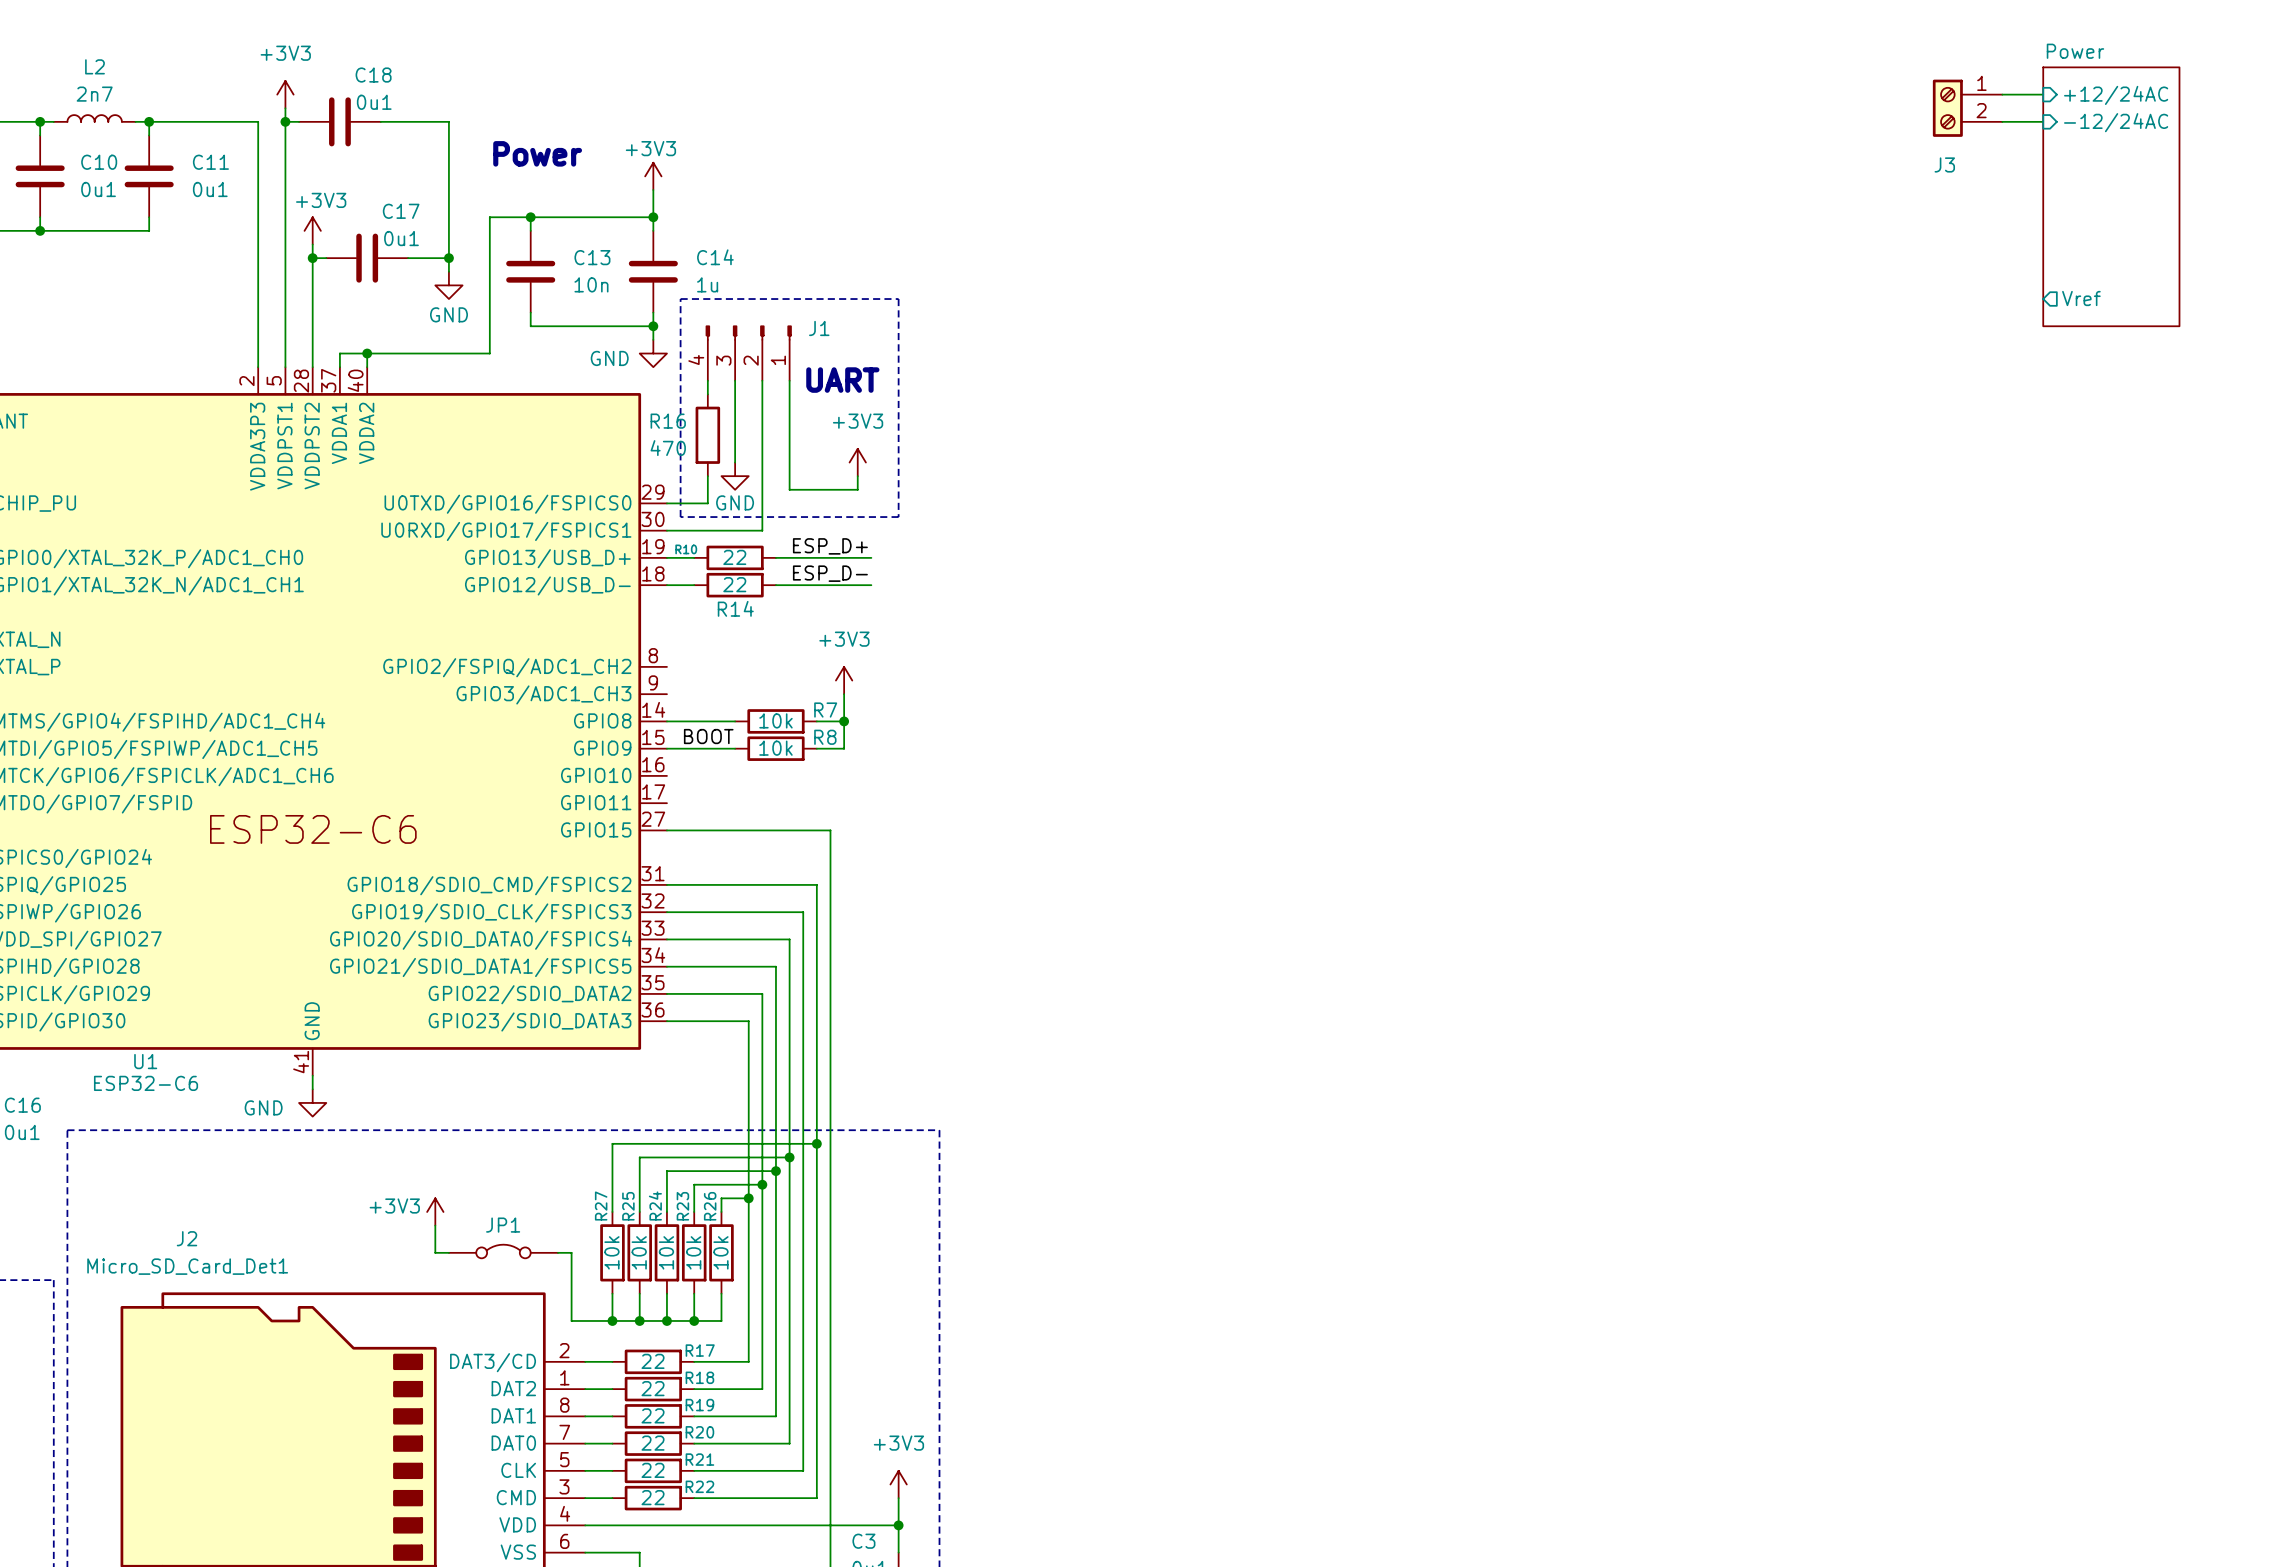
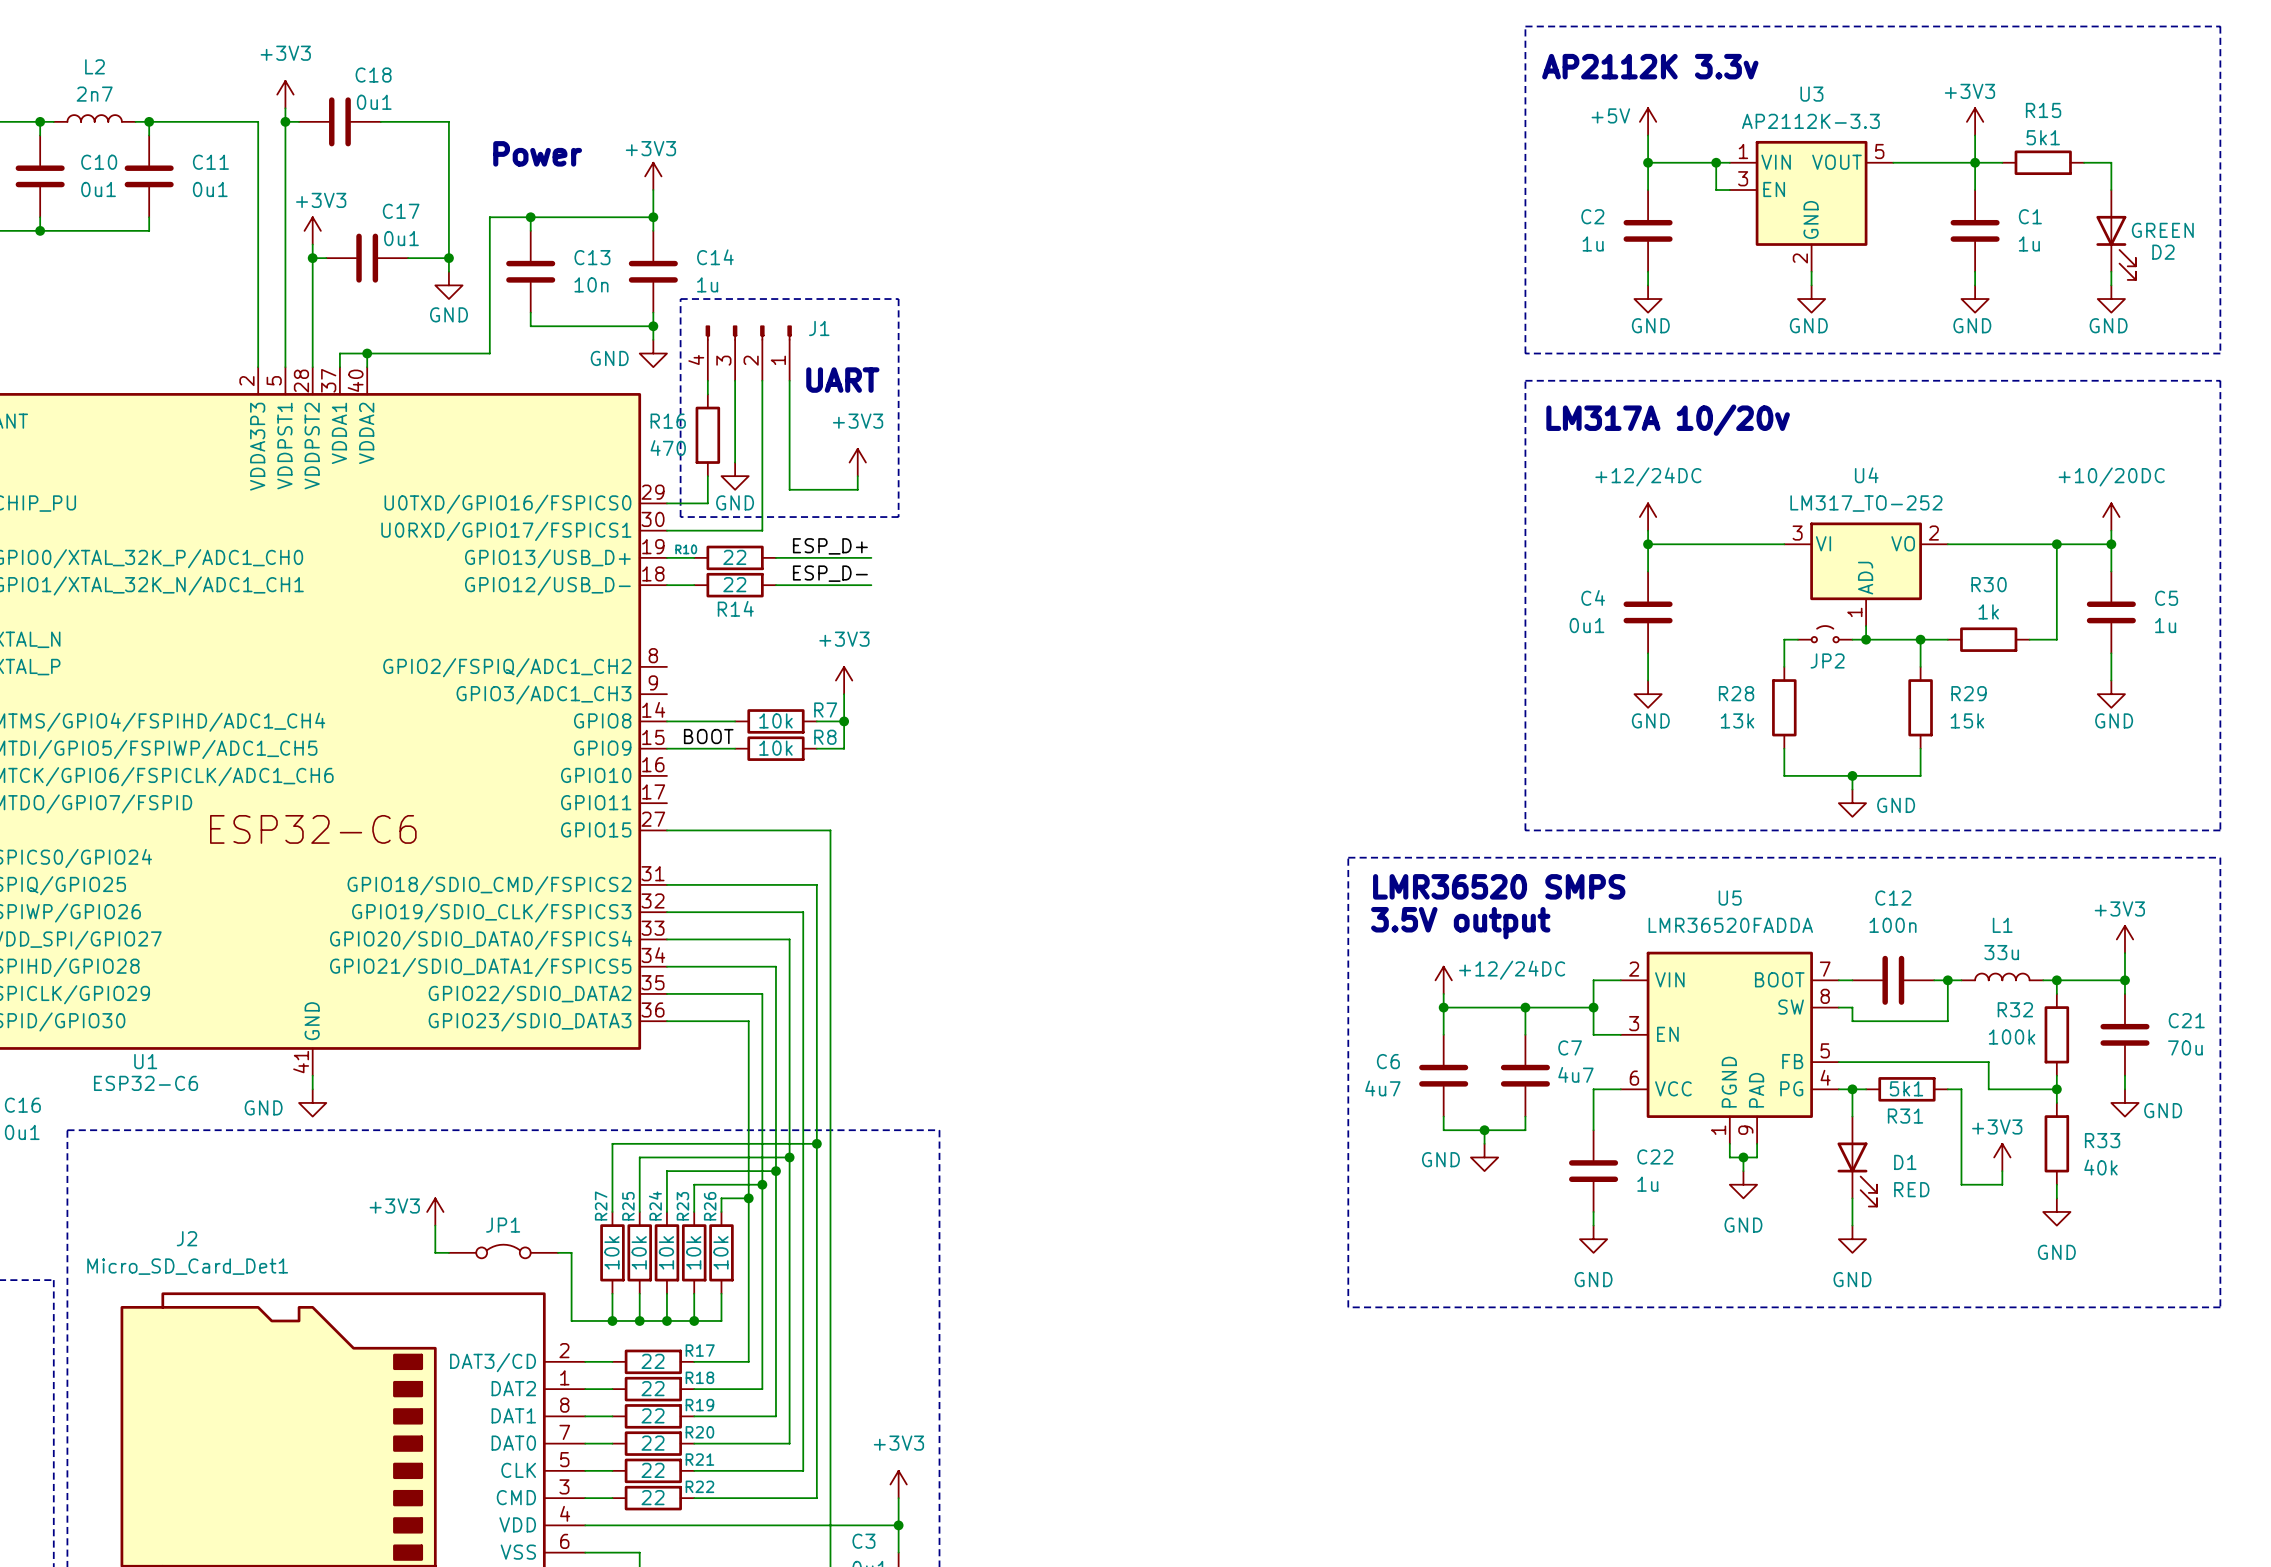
line: none -> (1525, 26) (2220, 26) (2220, 353) (1525, 353) (1525, 26)
text: none -> AP2112K 3.3v (1650, 66)
wire: (2002, 94) (2043, 94) -> none
sheet pin: +12/24AC (2116, 95) -> none
J3: (1967, 108) -> none
power symbol: none -> +5V (1648, 121)
power symbol: none -> +3V3 (1975, 121)
wire: (2002, 121) (2043, 121) -> none
sheet pin: -12/24AC (2116, 122) -> none
wire: none -> (1648, 135) (1648, 190)
wire: none -> (1975, 135) (1975, 190)
wire: none -> (1648, 162) (1729, 162)
junction: none -> (1648, 162)
wire: none -> (1716, 162) (1716, 190) (1729, 190)
junction: none -> (1716, 162)
wire: none -> (1893, 162) (2002, 162)
junction: none -> (1975, 162)
R15: none -> 5k1 (2043, 162)
wire: none -> (2084, 162) (2111, 162) (2111, 190)
sheet Power: (2111, 196) -> none
U3: none -> AP2112K-3.3 (1811, 206)
C2: none -> 1u (1648, 230)
C1: none -> 1u (1975, 230)
D2: none -> GREEN (2116, 234)
wire: none -> (1648, 271) (1648, 285)
wire: none -> (1811, 271) (1811, 285)
wire: none -> (1975, 271) (1975, 285)
wire: none -> (2111, 271) (2111, 285)
sheet pin: Vref (2081, 298) -> none
power symbol: none -> GND (1648, 299)
power symbol: none -> GND (1811, 299)
power symbol: none -> GND (1975, 299)
power symbol: none -> GND (2111, 299)
line: none -> (1525, 380) (1525, 830) (2220, 830) (2220, 380) (1525, 380)
text: none -> LM317A 10/20v (1668, 420)
power symbol: none -> +12/24DC (1648, 517)
power symbol: none -> +10/20DC (2111, 517)
wire: none -> (1648, 530) (1648, 571)
wire: none -> (2111, 530) (2111, 571)
wire: none -> (1648, 544) (1784, 544)
junction: none -> (1648, 544)
wire: none -> (1947, 544) (2111, 544)
wire: none -> (2056, 544) (2056, 639) (2029, 639)
junction: none -> (2056, 544)
junction: none -> (2111, 544)
U4: none -> LM317_TO-252 (1866, 574)
C4: none -> 0u1 (1648, 612)
C5: none -> 1u (2111, 612)
wire: none -> (1866, 626) (1866, 639)
JP2: none -> (1825, 634)
wire: none -> (1797, 639) (1784, 639) (1784, 666)
wire: none -> (1852, 639) (1947, 639)
junction: none -> (1866, 639)
wire: none -> (1920, 639) (1920, 666)
junction: none -> (1920, 639)
R30: none -> 1k (1988, 639)
wire: none -> (1648, 653) (1648, 680)
wire: none -> (2111, 653) (2111, 680)
power symbol: none -> GND (1648, 694)
power symbol: none -> GND (2111, 694)
R28: none -> 13k (1784, 707)
R29: none -> 15k (1920, 707)
wire: none -> (1784, 748) (1784, 775) (1920, 775) (1920, 748)
wire: none -> (1852, 775) (1852, 789)
junction: none -> (1852, 775)
power symbol: none -> GND (1852, 803)
line: none -> (1348, 857) (2220, 857) (2220, 1307) (1348, 1307) (1348, 857)
text: none -> LMR36520 SMPS (1499, 886)
text: none -> 3.5V output (1460, 923)
power symbol: none -> +3V3 (2124, 939)
wire: none -> (2124, 953) (2124, 993)
L1: none -> 33u (2002, 976)
power symbol: none -> +12/24DC (1443, 980)
wire: none -> (1620, 980) (1593, 980) (1593, 1034) (1620, 1034)
wire: none -> (1838, 980) (1852, 980)
C12: none -> 100n (1893, 980)
wire: none -> (1934, 980) (1961, 980)
wire: none -> (1947, 980) (1947, 1021) (1852, 1021) (1852, 1007) (1838, 1007)
junction: none -> (1947, 980)
wire: none -> (2043, 980) (2124, 980)
wire: none -> (2056, 980) (2056, 993)
junction: none -> (2056, 980)
junction: none -> (2124, 980)
wire: none -> (1443, 993) (1443, 1034)
wire: none -> (1443, 1007) (1593, 1007)
junction: none -> (1443, 1007)
wire: none -> (1525, 1007) (1525, 1034)
junction: none -> (1525, 1007)
junction: none -> (1593, 1007)
R32: none -> 100k (2056, 1034)
C21: none -> 70u (2124, 1034)
U5: none -> LMR36520FADDA (1729, 1047)
wire: none -> (1838, 1062) (1988, 1062) (1988, 1089) (2056, 1089)
C6: none -> 4u7 (1443, 1075)
C7: none -> 4u7 (1525, 1075)
wire: none -> (2056, 1075) (2056, 1102)
wire: none -> (2124, 1075) (2124, 1089)
wire: none -> (1620, 1089) (1593, 1089) (1593, 1130)
wire: none -> (1838, 1089) (1866, 1089)
wire: none -> (1852, 1089) (1852, 1116)
junction: none -> (1852, 1089)
R31: none -> 5k1 (1906, 1089)
wire: none -> (1947, 1089) (1961, 1089) (1961, 1184) (2002, 1184) (2002, 1171)
junction: none -> (2056, 1089)
power symbol: none -> GND (2124, 1102)
wire: none -> (1443, 1116) (1443, 1130) (1525, 1130) (1525, 1116)
wire: none -> (1484, 1130) (1484, 1143)
junction: none -> (1484, 1130)
wire: none -> (1729, 1143) (1729, 1157) (1757, 1157) (1757, 1143)
R33: none -> 40k (2056, 1143)
power symbol: none -> GND (1484, 1157)
wire: none -> (1743, 1157) (1743, 1171)
junction: none -> (1743, 1157)
power symbol: none -> +3V3 (2002, 1157)
D1: none -> RED (1857, 1161)
C22: none -> 1u (1593, 1171)
power symbol: none -> GND (1743, 1184)
wire: none -> (2056, 1184) (2056, 1198)
wire: none -> (1852, 1198) (1852, 1225)
wire: none -> (1593, 1211) (1593, 1225)
power symbol: none -> GND (2056, 1211)
power symbol: none -> GND (1593, 1239)
power symbol: none -> GND (1852, 1239)

